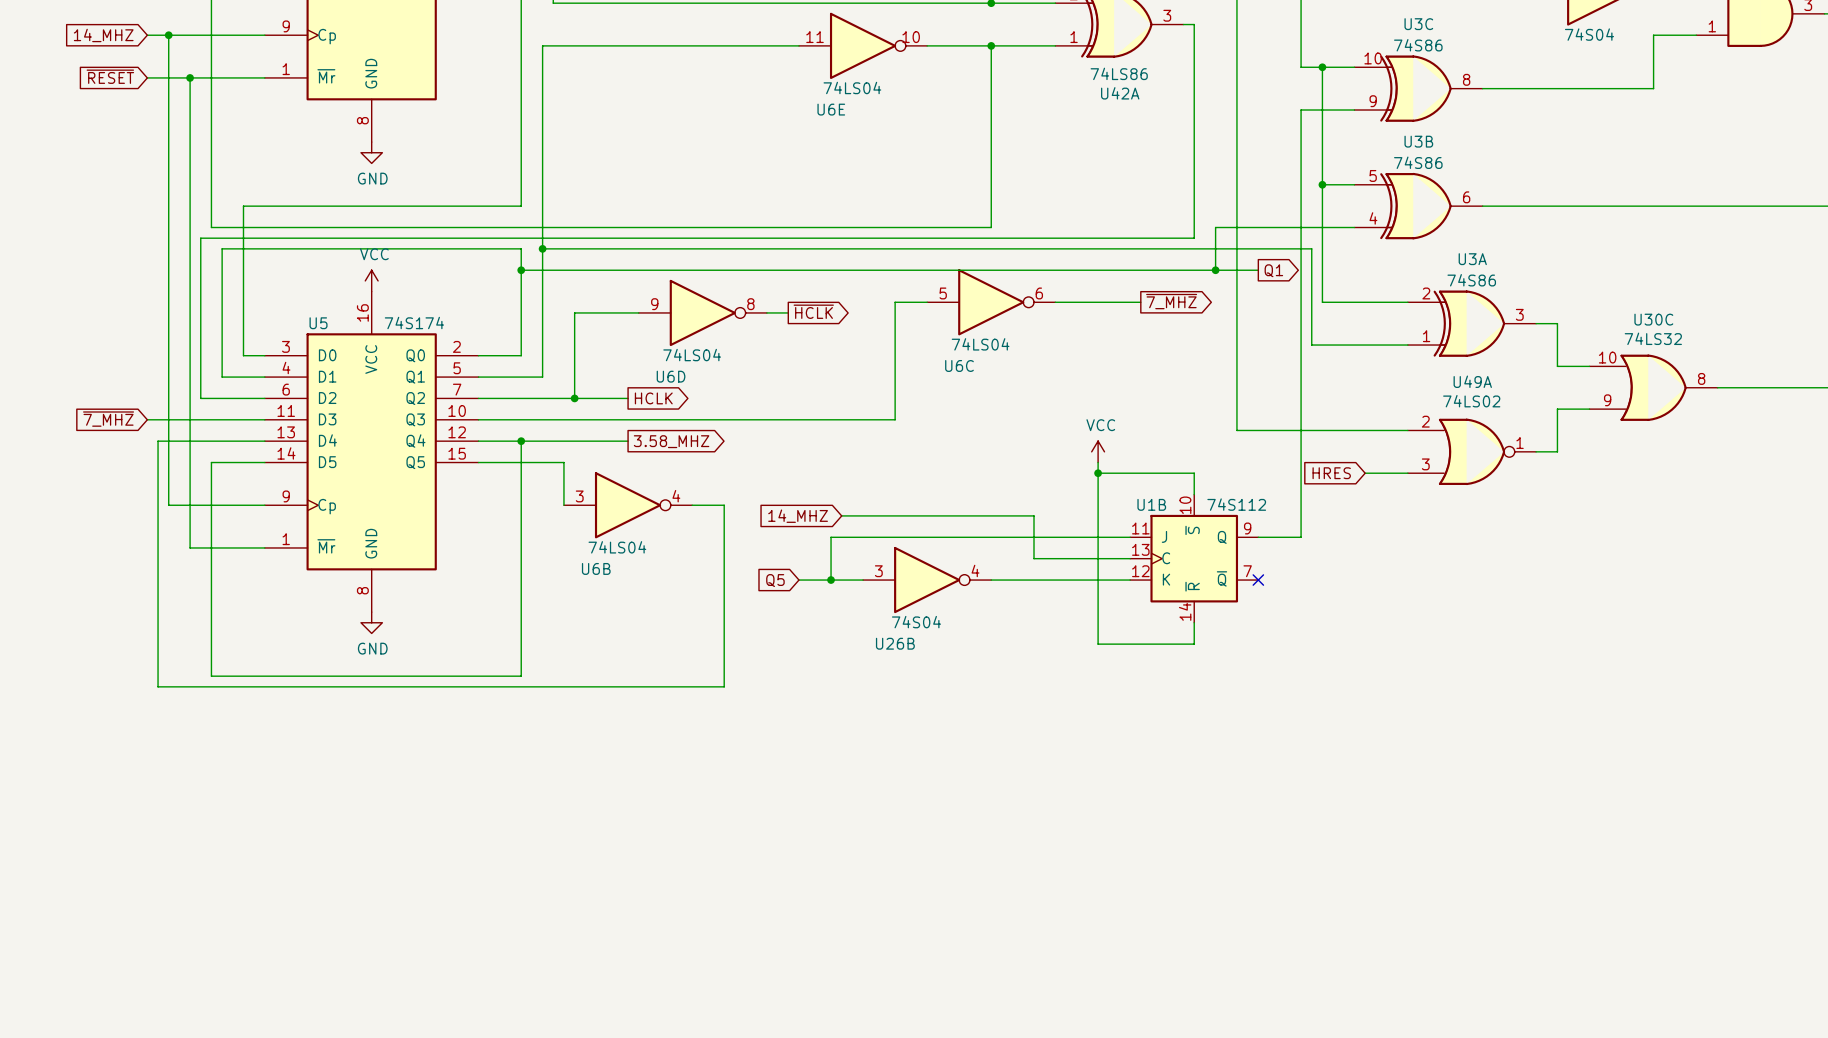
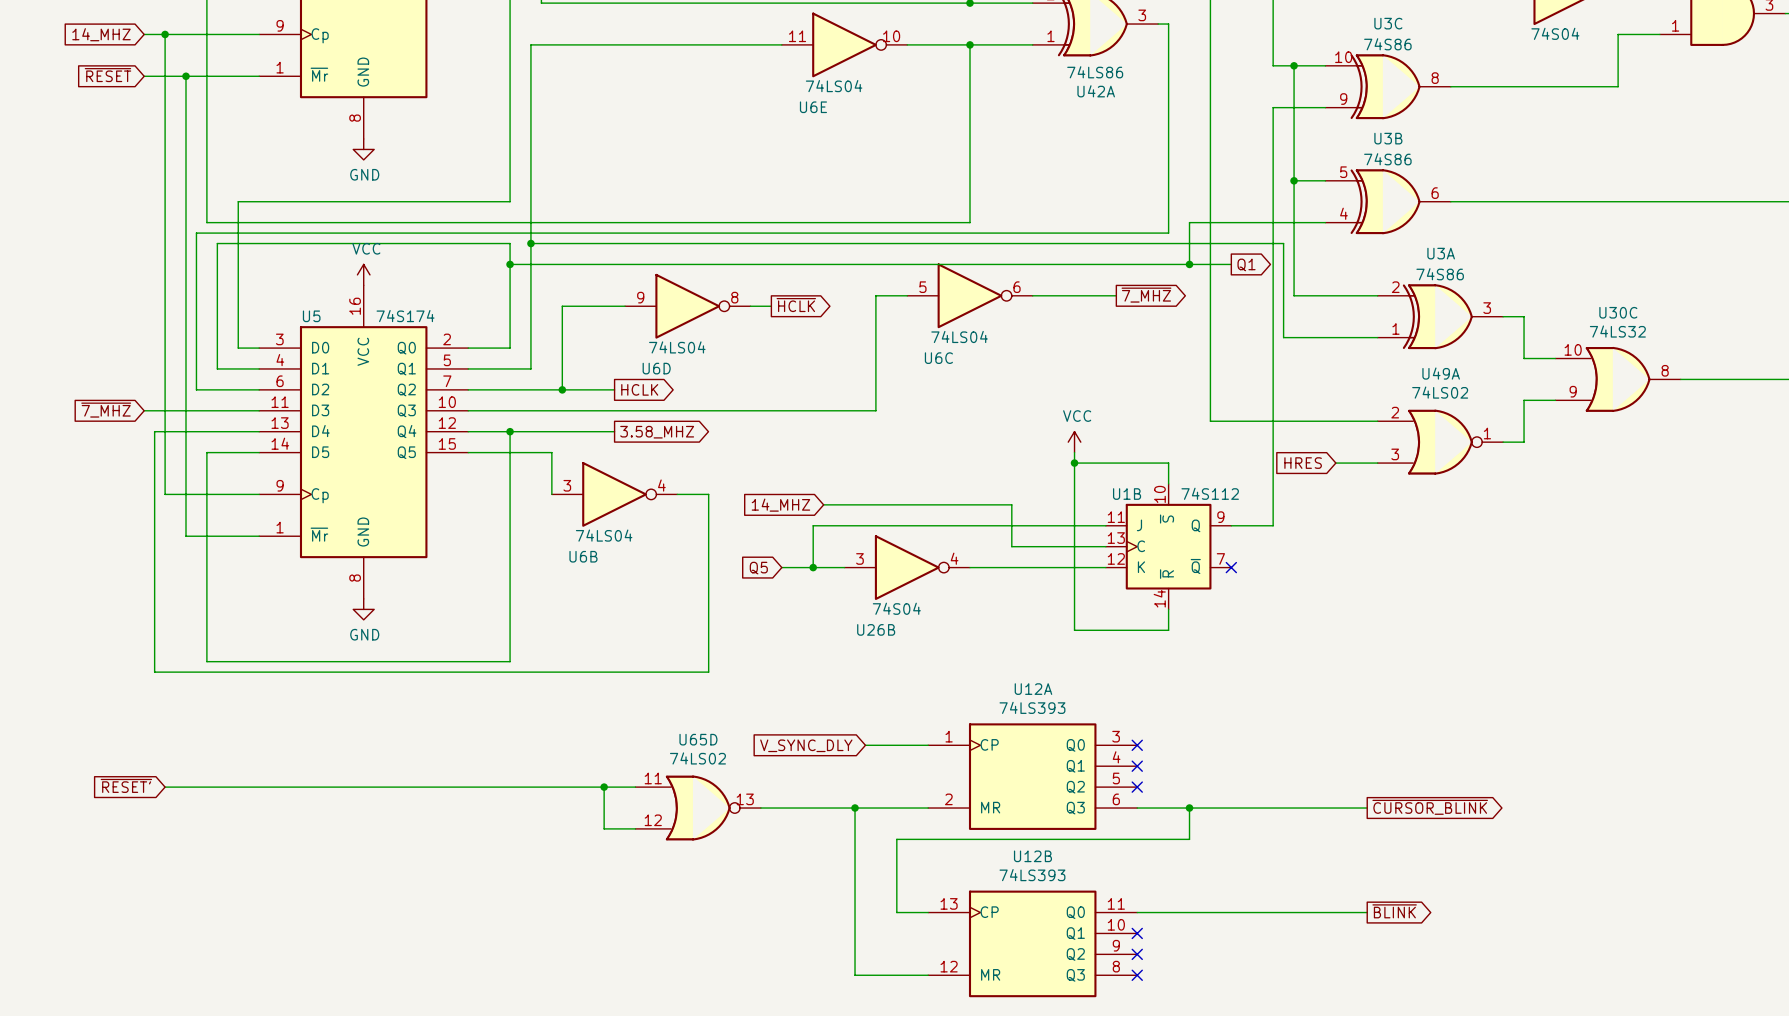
wire: none -> (865, 745) (928, 745)
no-connect mark: none -> (1137, 745)
global label: none -> V_SYNC_DLY (806, 745)
no-connect mark: none -> (1137, 766)
U12A: none -> 74LS393 (1032, 776)
global label: none -> ~{RESET'} (126, 785)
wire: none -> (165, 787) (635, 787)
wire: none -> (604, 787) (604, 828) (635, 828)
junction: none -> (604, 787)
no-connect mark: none -> (1137, 787)
U65D: none -> 74LS02 (698, 808)
wire: none -> (760, 808) (928, 808)
wire: none -> (855, 808) (855, 975) (928, 975)
junction: none -> (855, 808)
wire: none -> (1137, 808) (1367, 808)
wire: none -> (1189, 808) (1189, 839) (896, 839) (896, 912) (928, 912)
junction: none -> (1189, 808)
global label: none -> ~{CURSOR_BLINK} (1430, 807)
global label: none -> ~{BLINK} (1394, 911)
wire: none -> (1137, 912) (1367, 912)
no-connect mark: none -> (1137, 933)
U12B: none -> 74LS393 (1032, 943)
no-connect mark: none -> (1137, 954)
no-connect mark: none -> (1137, 975)

